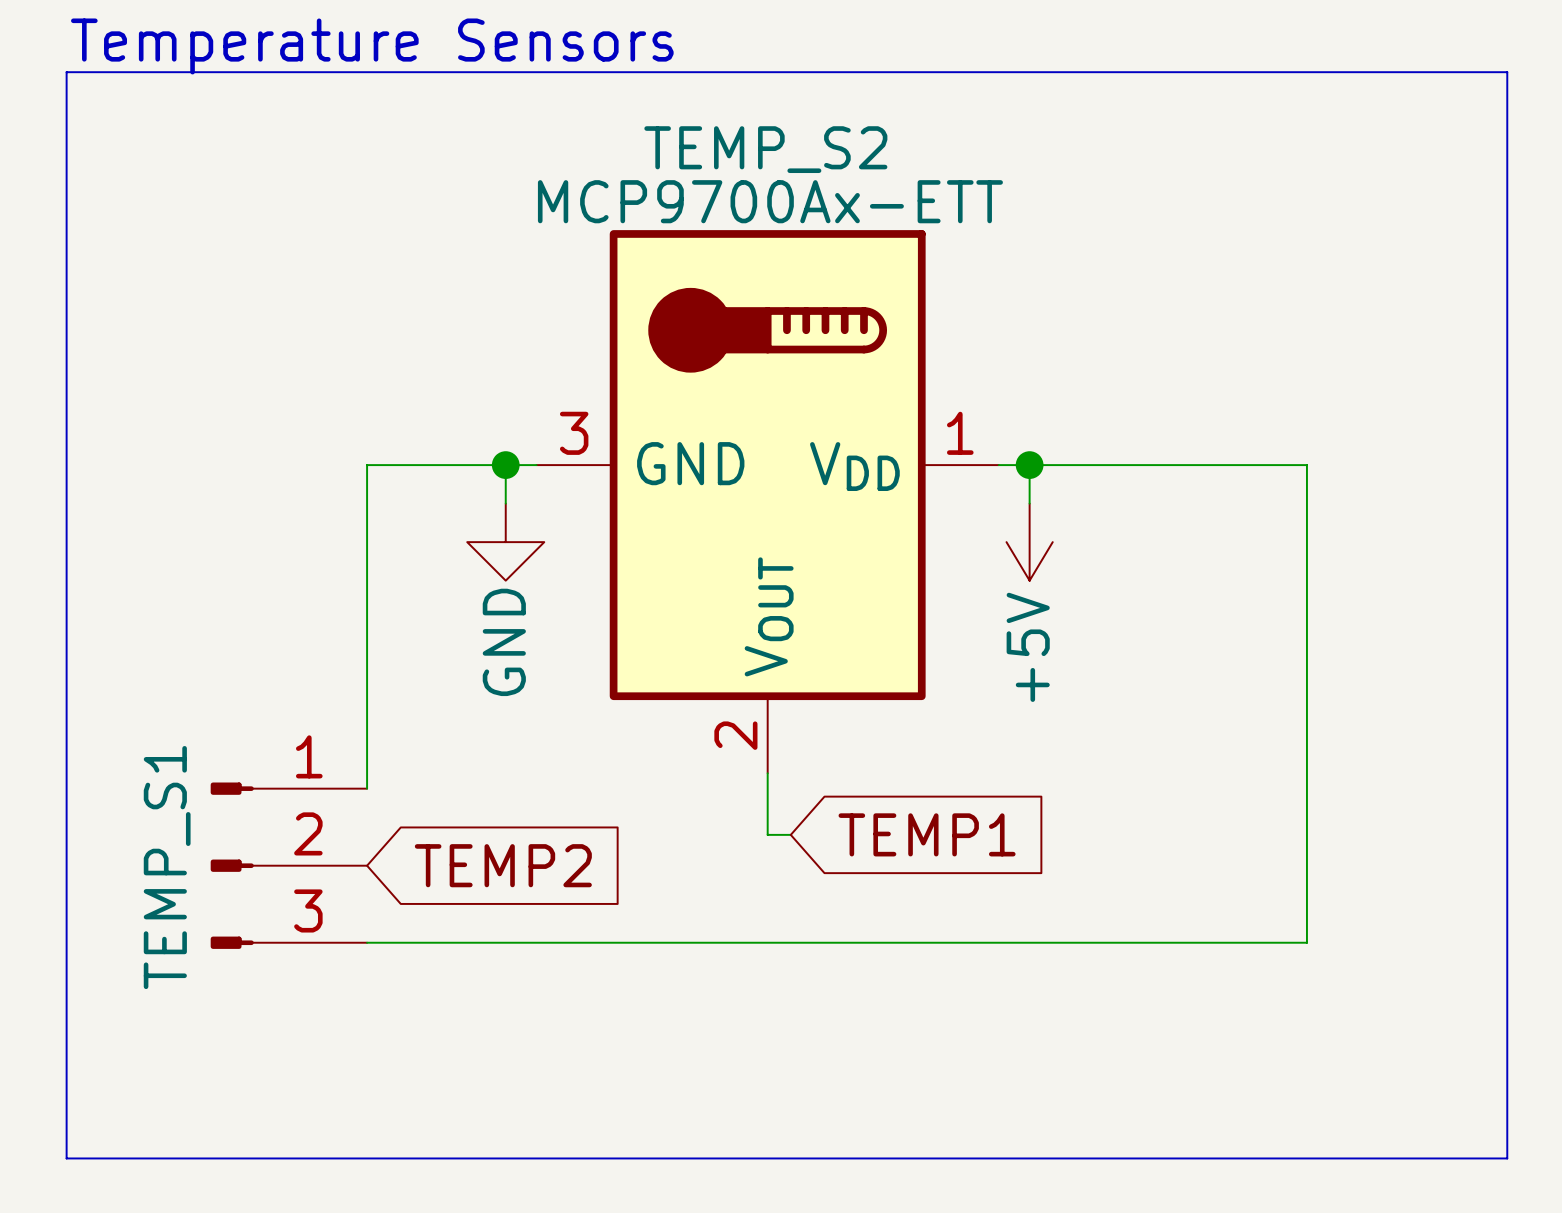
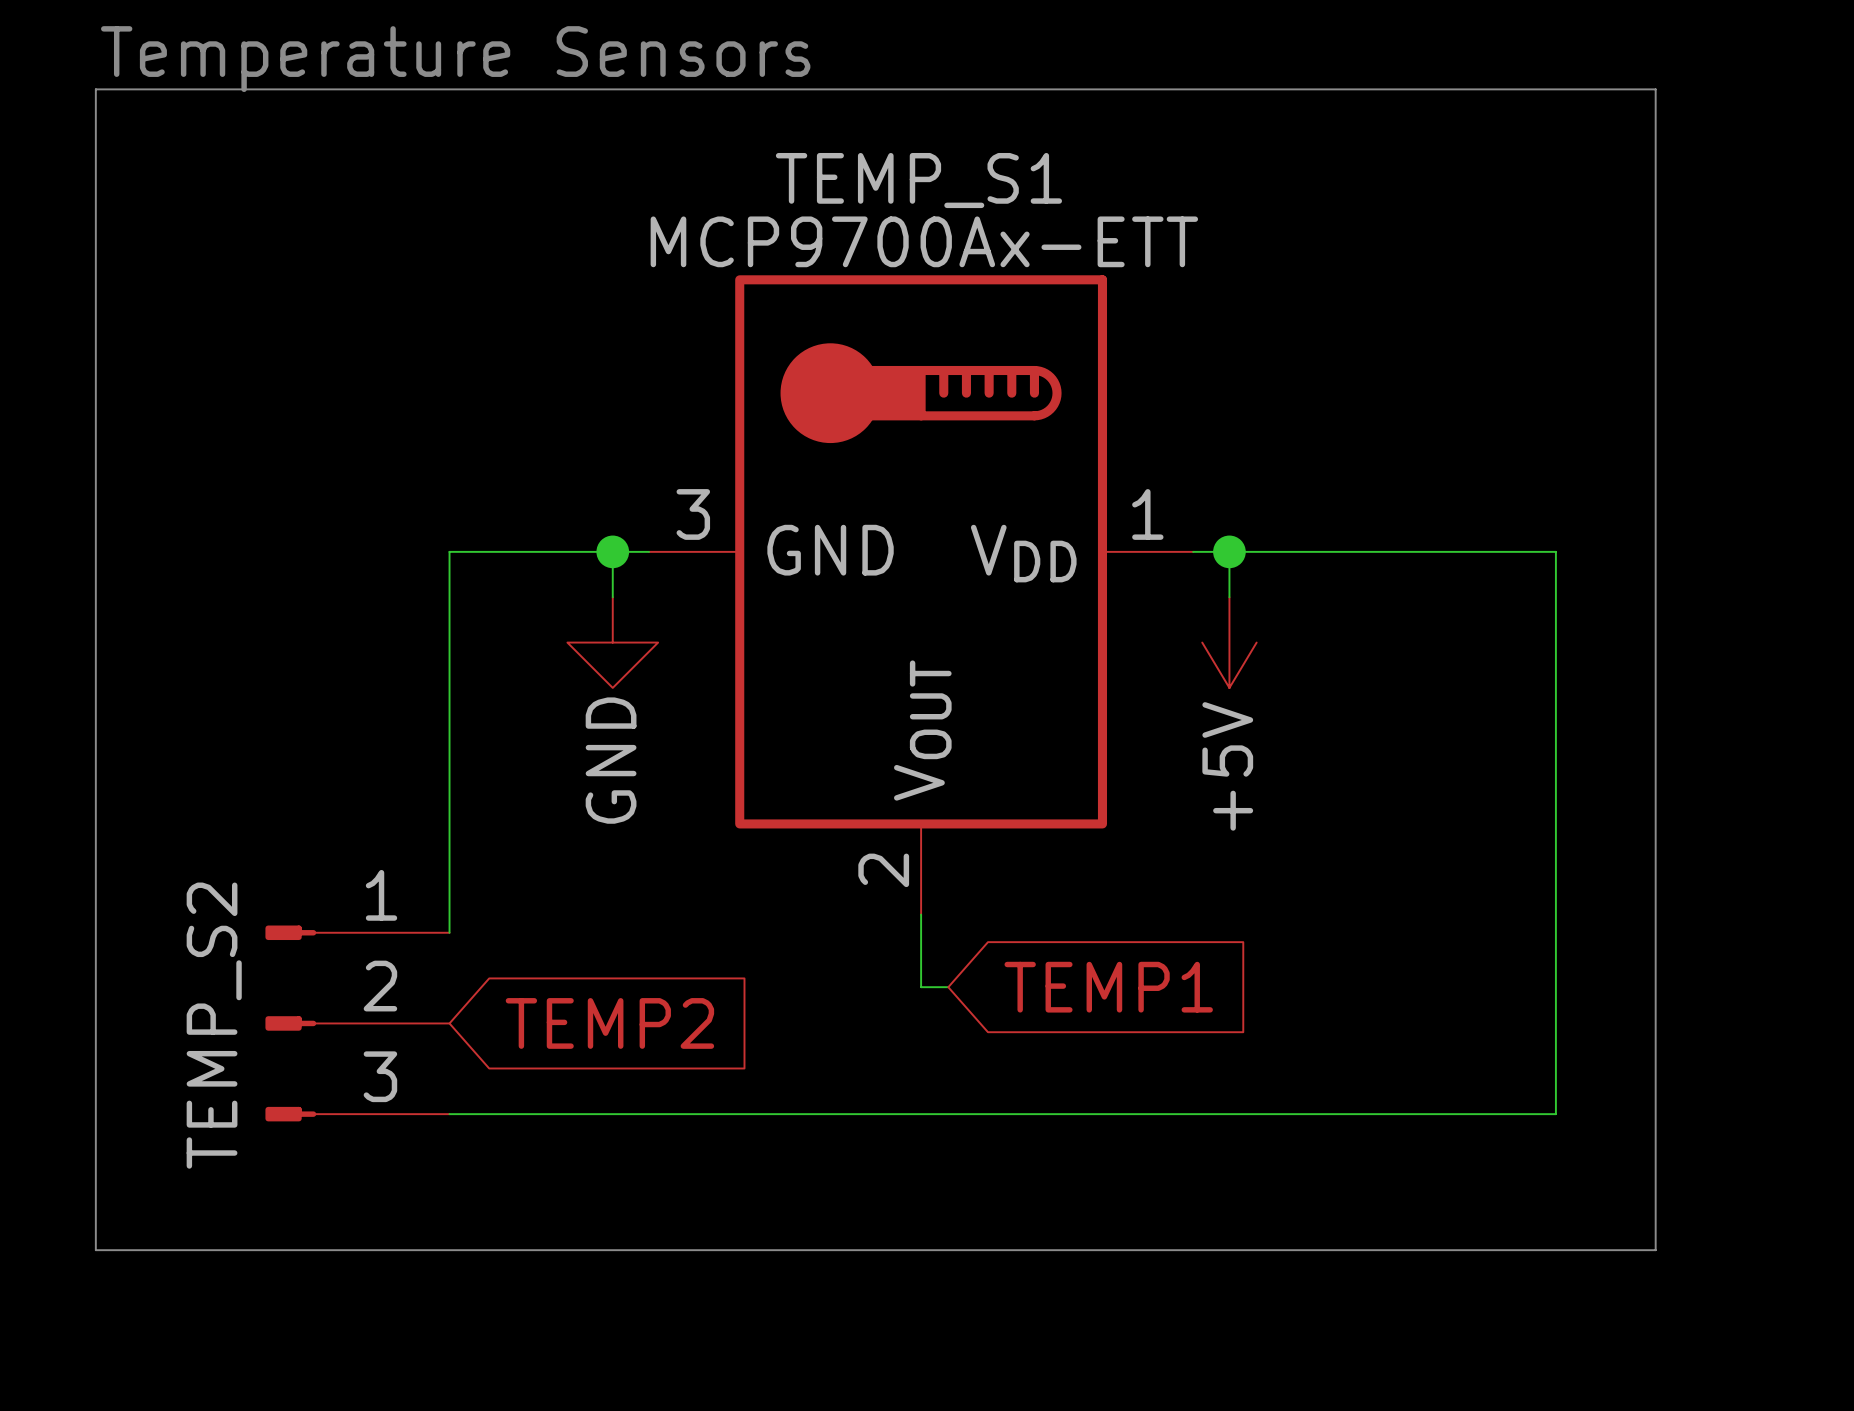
line: (1391, 72) (1507, 72) (1507, 1158) (66, 1158) (66, 1058) -> (1655, 89) (1655, 1250) (95, 1250)
TEMP_S2 name: TEMP_S2 (765, 149) -> TEMP_S1 (918, 180)
TEMP_S1 name: TEMP_S1 (167, 867) -> TEMP_S2 (214, 1025)

